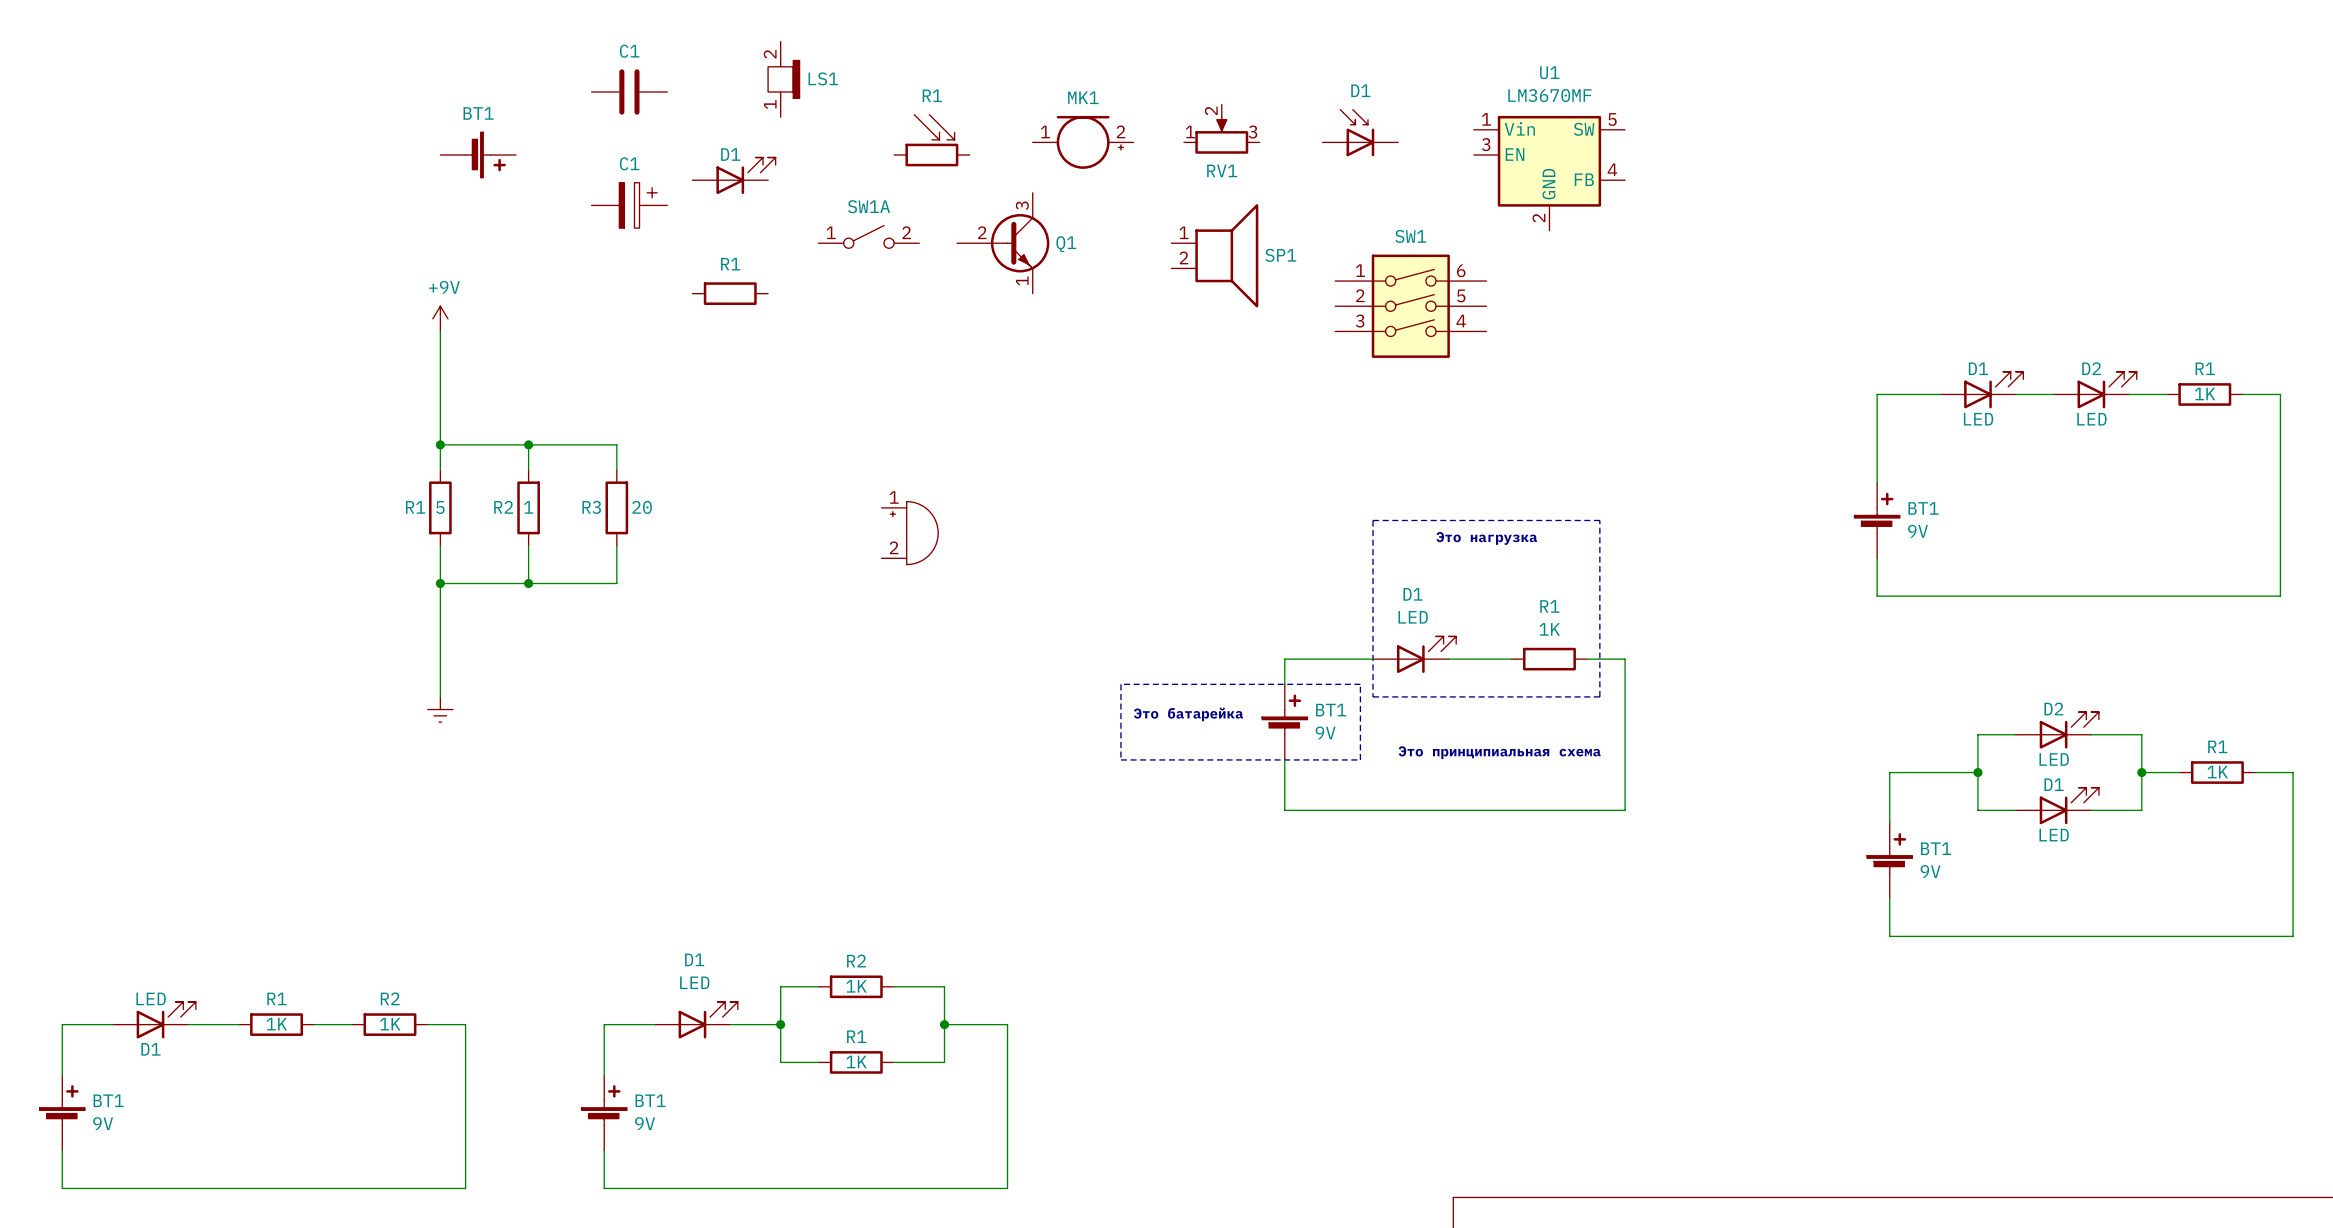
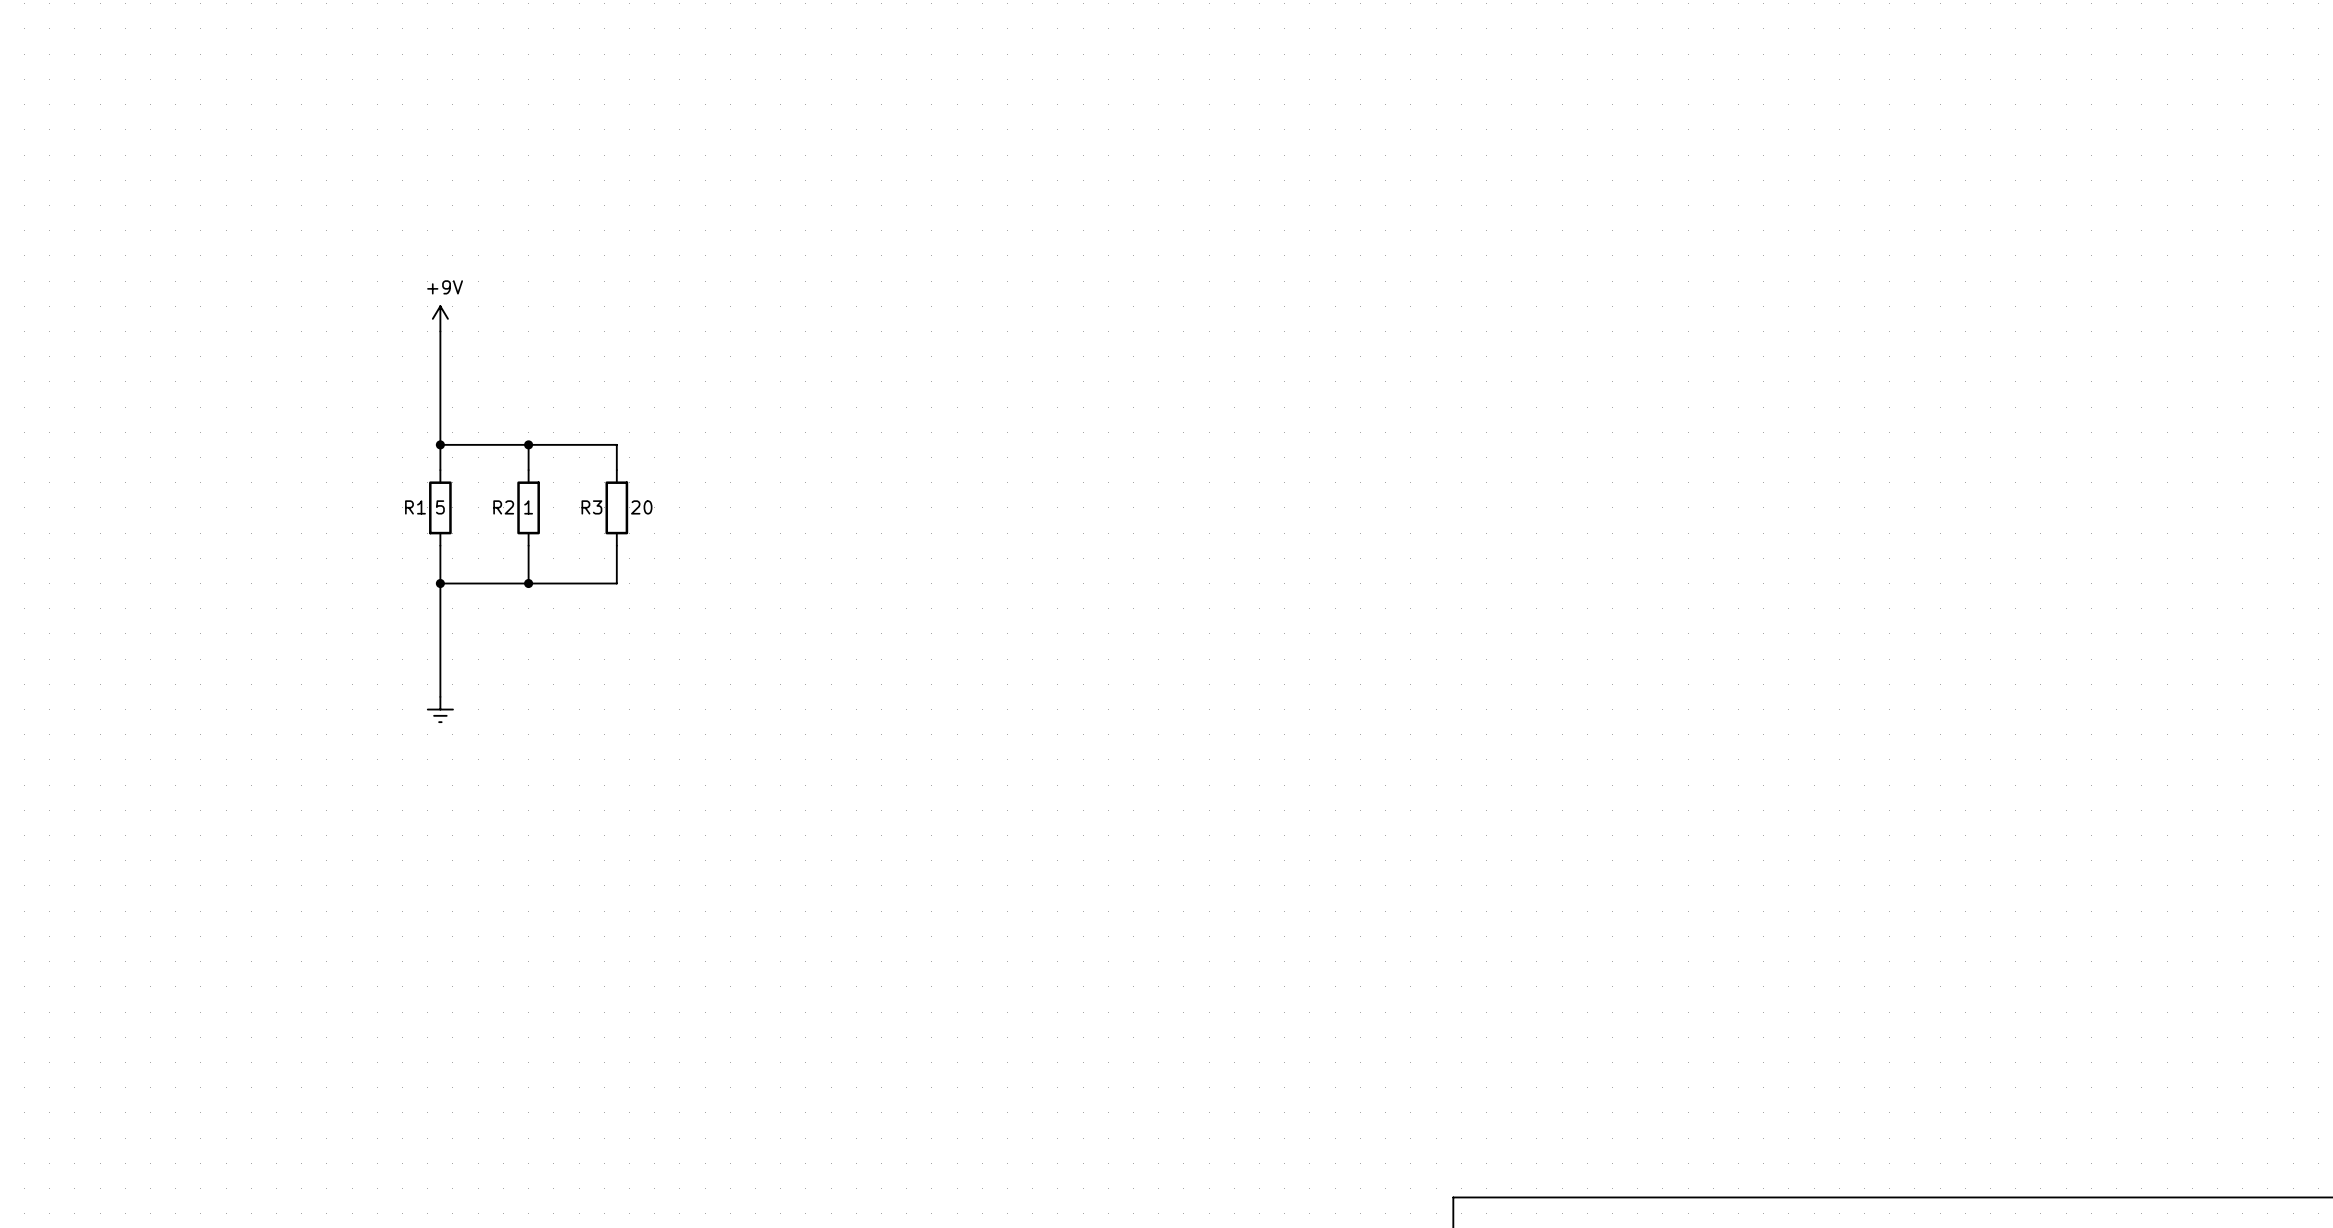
LS1: (783, 79) -> none
C1: (629, 91) -> none
RV1: (1221, 129) -> none
D1: (1360, 132) -> none
R1: (931, 140) -> none
MK1: (1083, 142) -> none
BT1: (478, 155) -> none
U1: LM3670MF (1549, 173) -> none
D1: (734, 175) -> none
C1: (629, 205) -> none
SW1A: (868, 236) -> none
Q1: (1003, 243) -> none
SP1: (1214, 255) -> none
R1: (730, 293) -> none
SW1: (1410, 306) -> none
D1: LED (1981, 390) -> none
D2: LED (2095, 390) -> none
wire: (1940, 394) (1877, 394) (1877, 482) -> none
wire: (2015, 394) (2053, 394) -> none
wire: (2129, 394) (2167, 394) -> none
R1: 1K (2204, 394) -> none
wire: (2242, 394) (2280, 394) (2280, 596) (1877, 596) (1877, 558) -> none
line: (1373, 520) (1599, 520) (1599, 696) (1373, 696) (1373, 520) -> none
BT1: 9V (1877, 520) -> none
part: (909, 533) -> none
text: Это нагрузка (1486, 538) -> none
D1: LED (1414, 654) -> none
wire: (1373, 659) (1284, 659) (1284, 684) -> none
wire: (1448, 659) (1511, 659) -> none
R1: 1K (1549, 659) -> none
wire: (1587, 659) (1625, 659) (1625, 810) (1284, 810) (1284, 759) -> none
line: (1120, 684) (1360, 684) (1360, 759) (1120, 759) (1120, 684) -> none
text: Это батарейка (1188, 714) -> none
BT1: 9V (1284, 722) -> none
D2: LED (2057, 730) -> none
wire: (2015, 734) (1977, 734) (1977, 810) (2015, 810) -> none
wire: (2091, 734) (2141, 734) (2141, 810) (2091, 810) -> none
text: Это принципиальная схема (1499, 752) -> none
wire: (1977, 772) (1889, 772) (1889, 822) -> none
junction: (1977, 772) -> none
wire: (2141, 772) (2179, 772) -> none
junction: (2141, 772) -> none
R1: 1K (2217, 772) -> none
wire: (2255, 772) (2293, 772) (2293, 936) (1889, 936) (1889, 898) -> none
D1: LED (2057, 805) -> none
BT1: 9V (1889, 860) -> none
wire: (818, 986) (780, 986) (780, 1062) (818, 1062) -> none
R2: 1K (856, 986) -> none
wire: (894, 986) (944, 986) (944, 1062) (894, 1062) -> none
D1: LED (154, 1020) -> none
D1: LED (696, 1020) -> none
wire: (112, 1024) (62, 1024) (62, 1075) -> none
wire: (188, 1024) (238, 1024) -> none
R1: 1K (276, 1024) -> none
wire: (314, 1024) (352, 1024) -> none
R2: 1K (389, 1024) -> none
wire: (427, 1024) (465, 1024) (465, 1188) (62, 1188) (62, 1150) -> none
wire: (654, 1024) (604, 1024) (604, 1075) -> none
wire: (730, 1024) (780, 1024) -> none
junction: (780, 1024) -> none
wire: (944, 1024) (1007, 1024) (1007, 1188) (604, 1188) (604, 1150) -> none
junction: (944, 1024) -> none
R1: 1K (856, 1062) -> none
BT1: 9V (62, 1112) -> none
BT1: 9V (604, 1112) -> none

